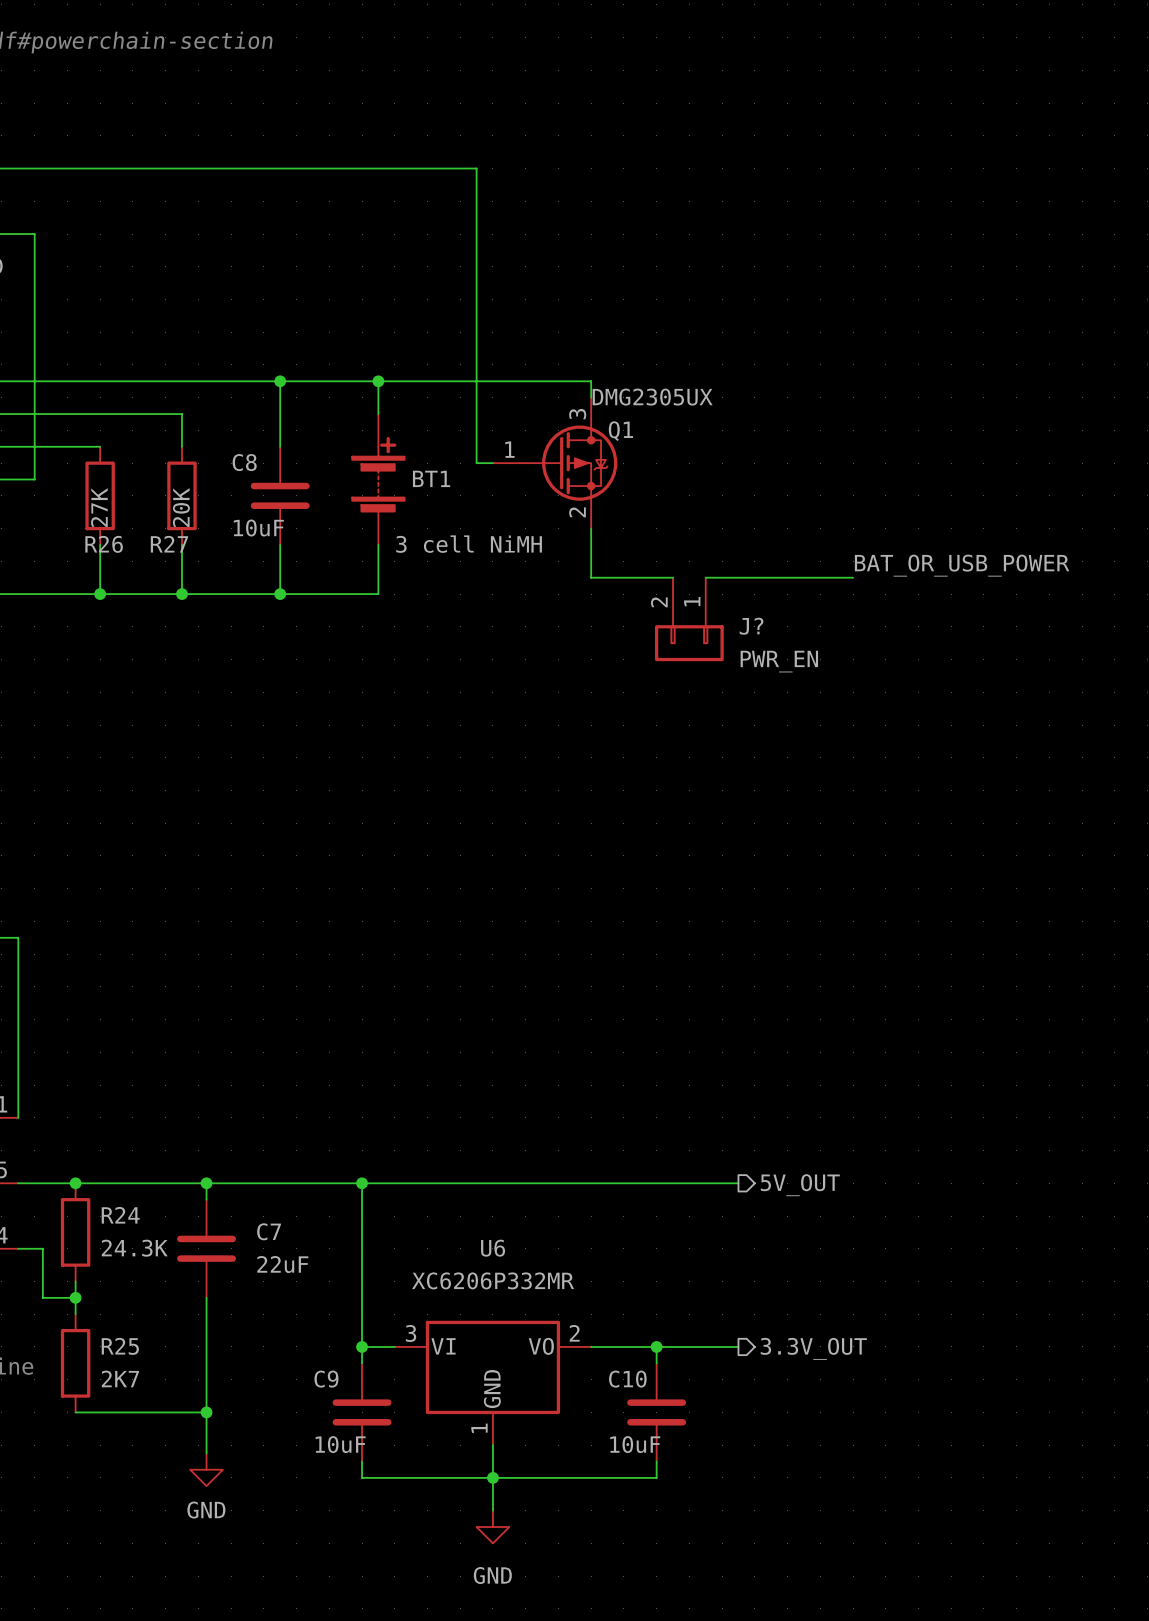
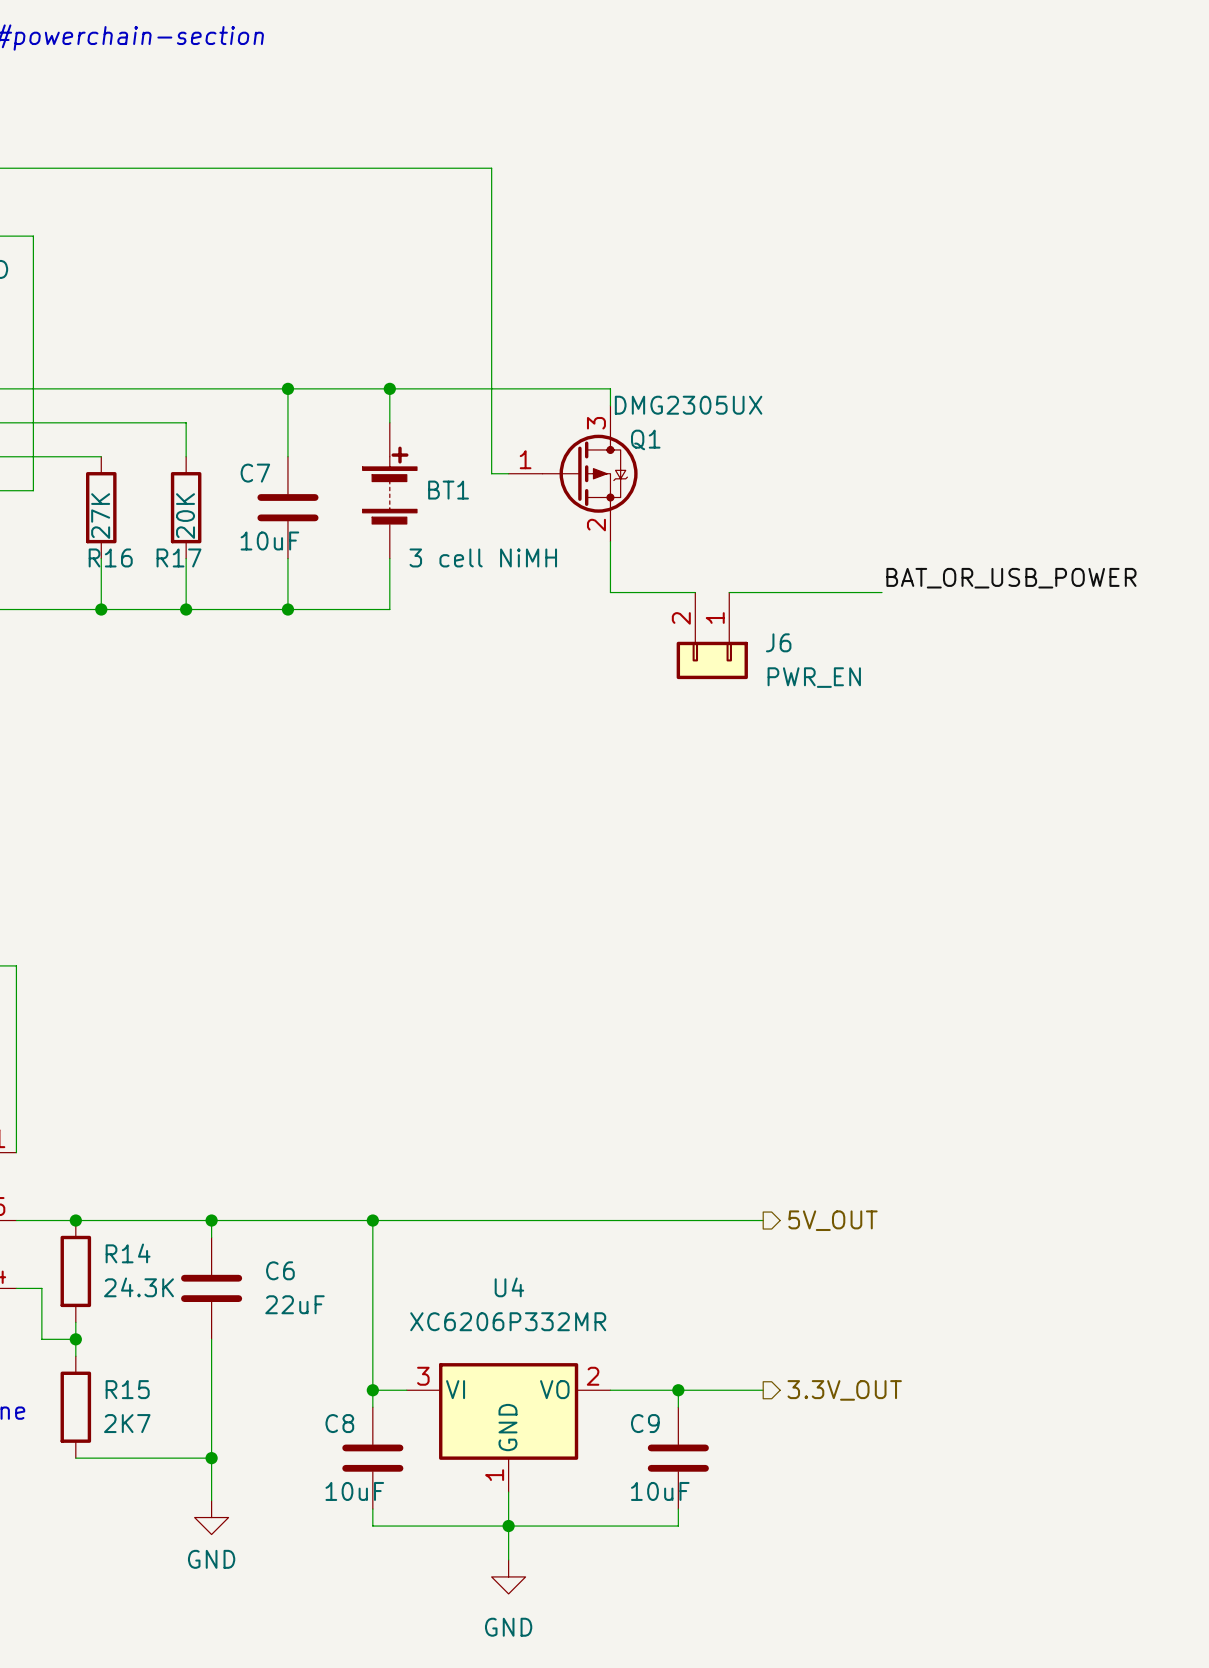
C8 name: C8 (244, 462) -> C7 (255, 473)
R26 name: R26 (104, 544) -> R16 (110, 557)
R27 name: R27 (169, 544) -> R17 (178, 557)
J? name: J? (751, 626) -> J6 (778, 642)
R24 name: R24 (120, 1215) -> R14 (128, 1253)
C7 name: C7 (269, 1231) -> C6 (280, 1270)
U6 name: U6 (493, 1248) -> U4 (509, 1287)
R25 name: R25 (120, 1346) -> R15 (127, 1389)
C9 name: C9 (326, 1379) -> C8 (339, 1423)
C10 name: C10 (627, 1379) -> C9 (645, 1423)

